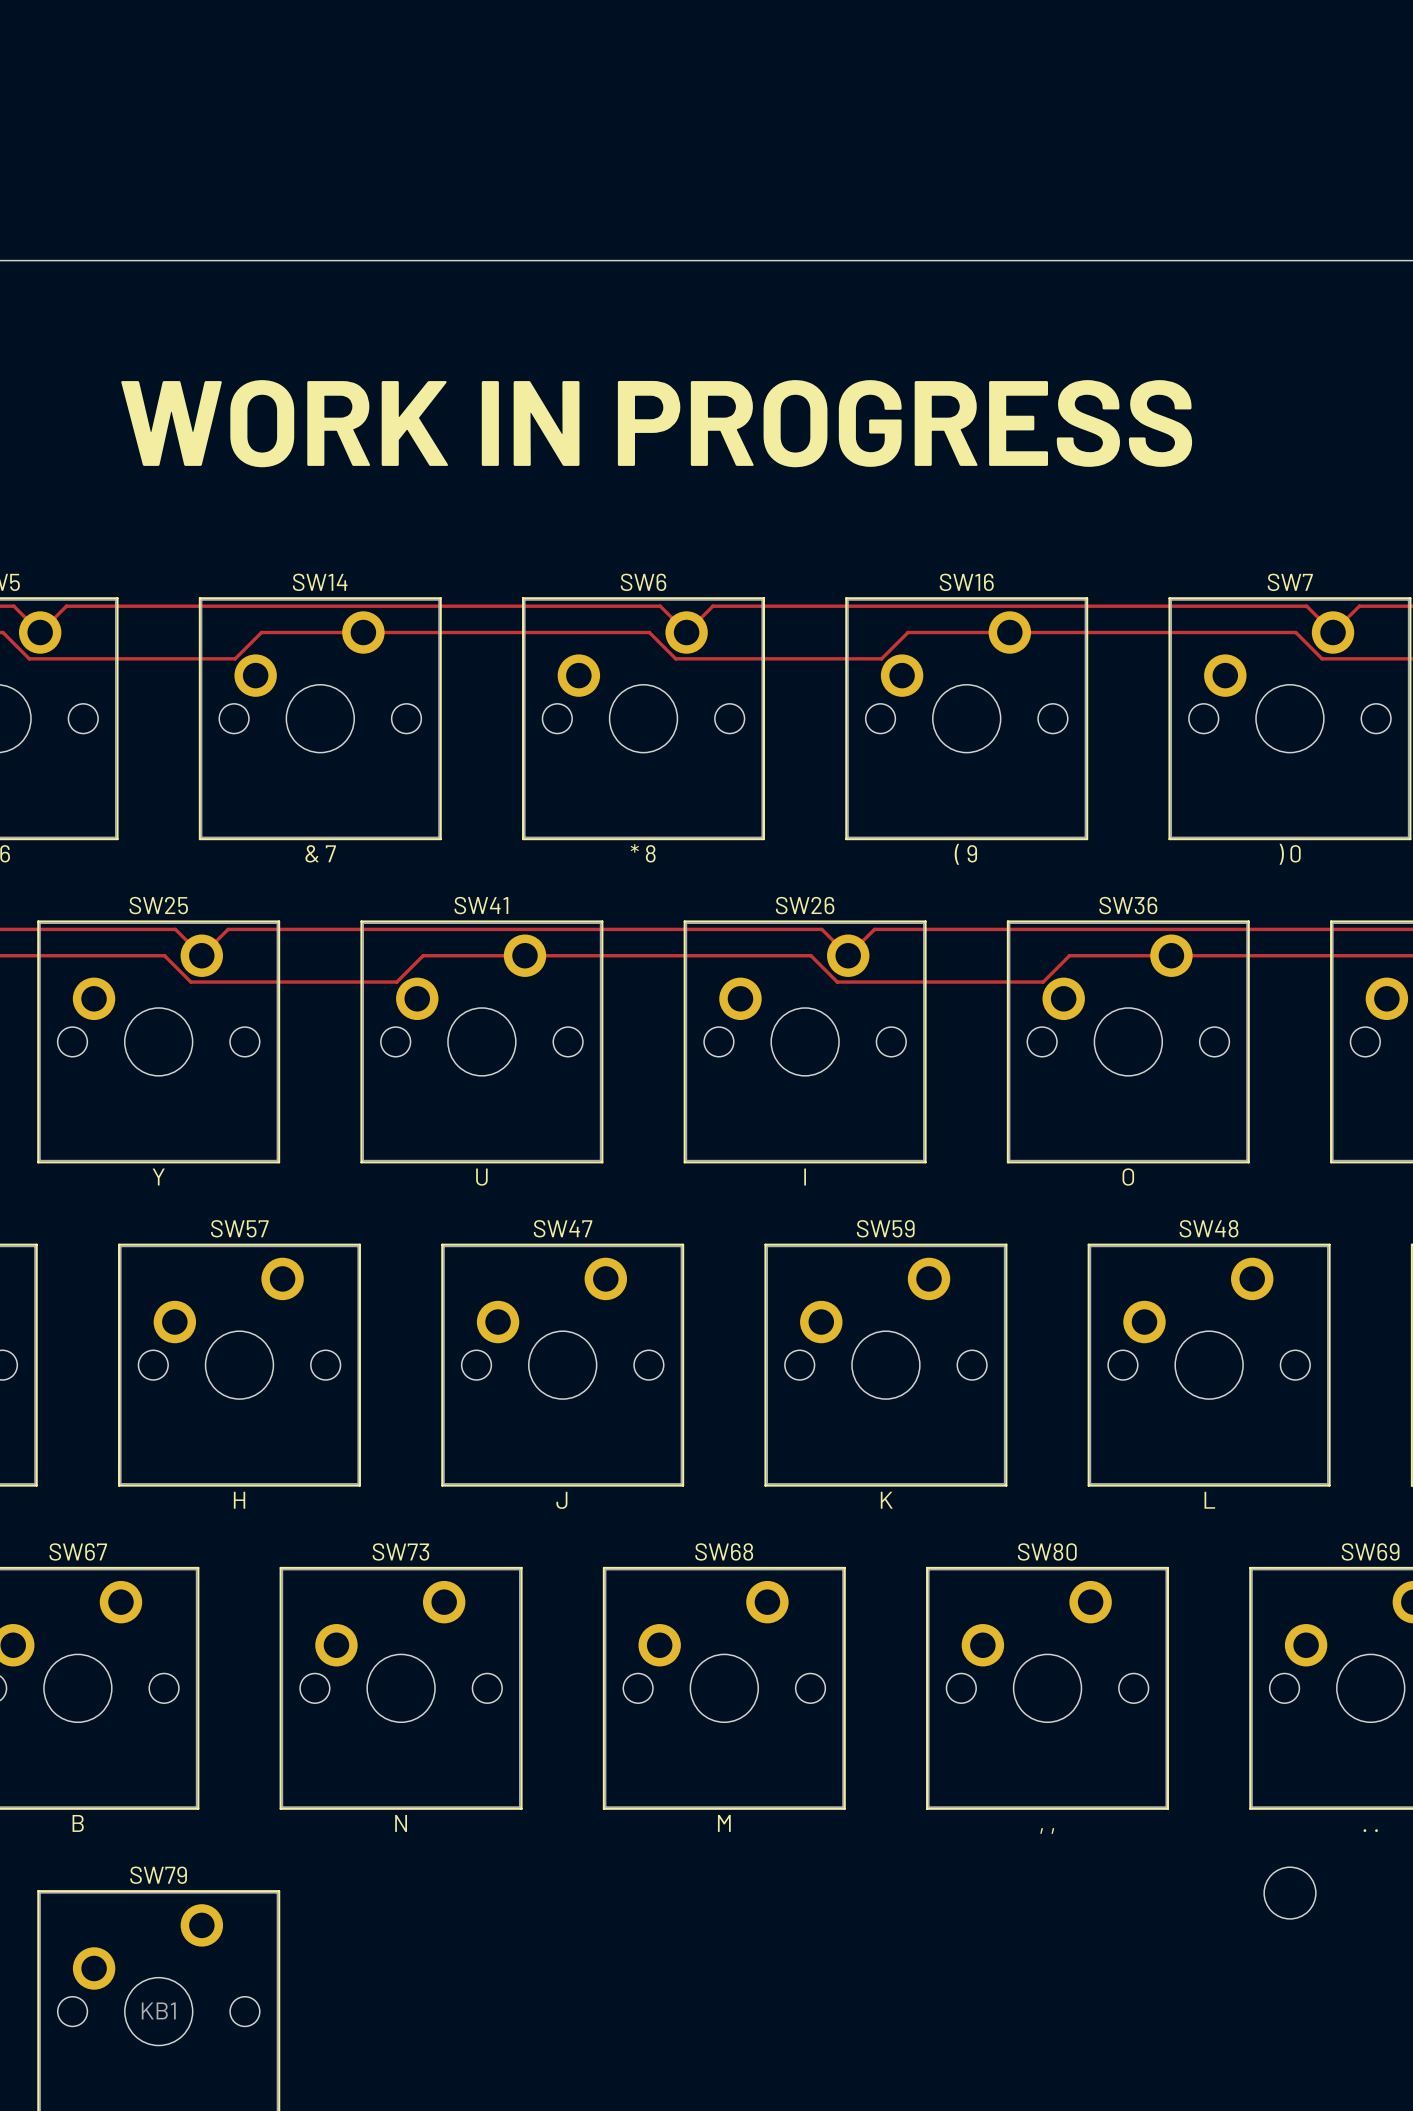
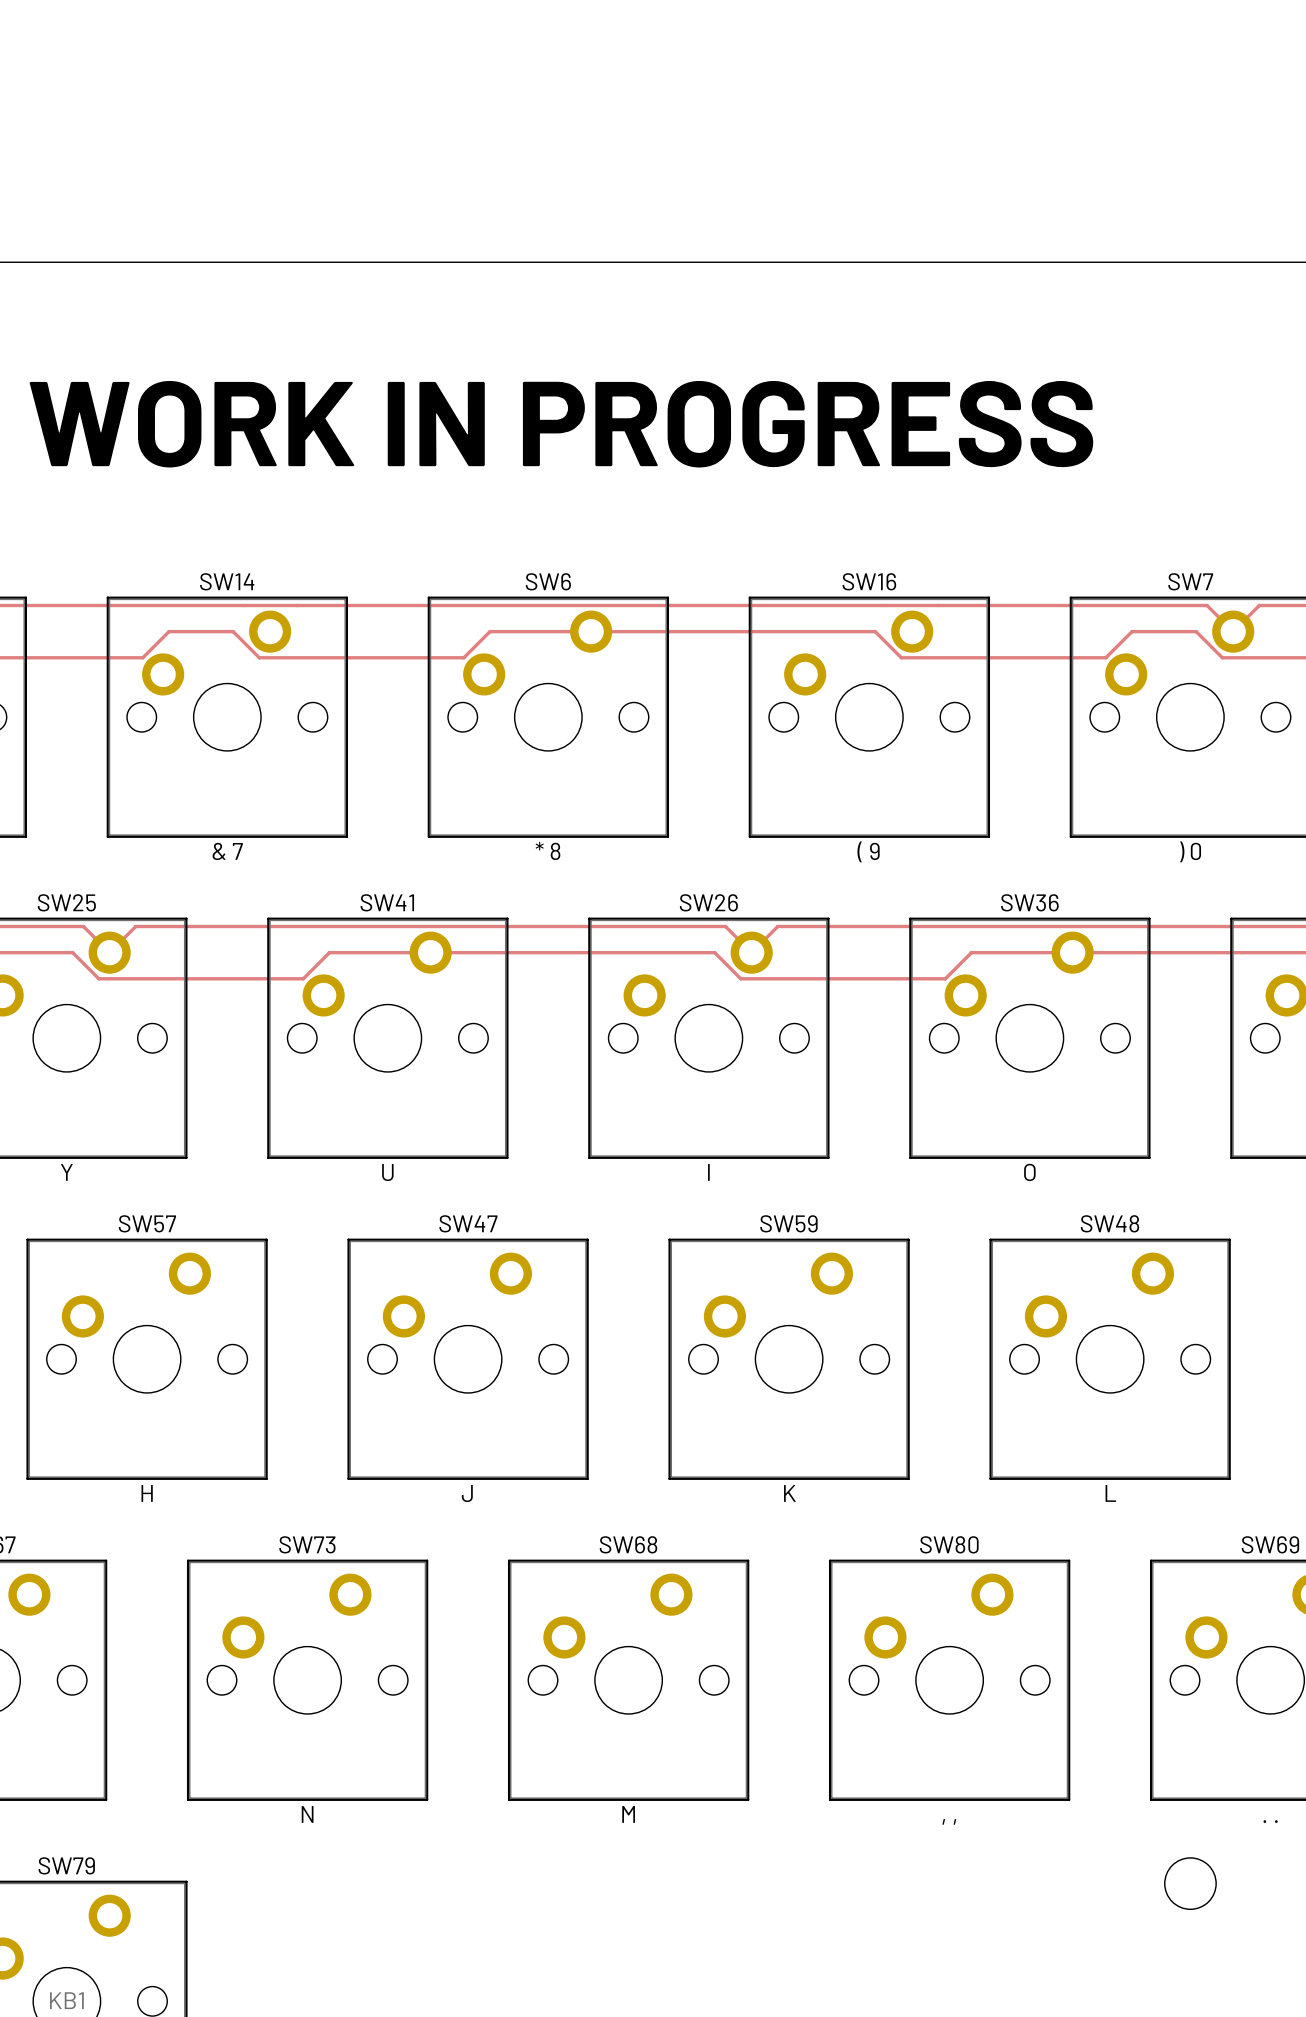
top track: (660, 606) (686, 632) (712, 606) -> (565, 605) (617, 605)
top track: (326, 632) (584, 632) -> (233, 631) (259, 657) (463, 657) (490, 631)
top track: (649, 632) (675, 658) (881, 658) (907, 632) -> (554, 631) (811, 631)
top track: (972, 632) (1231, 632) -> (875, 631) (901, 657) (1105, 657) (1132, 631)

